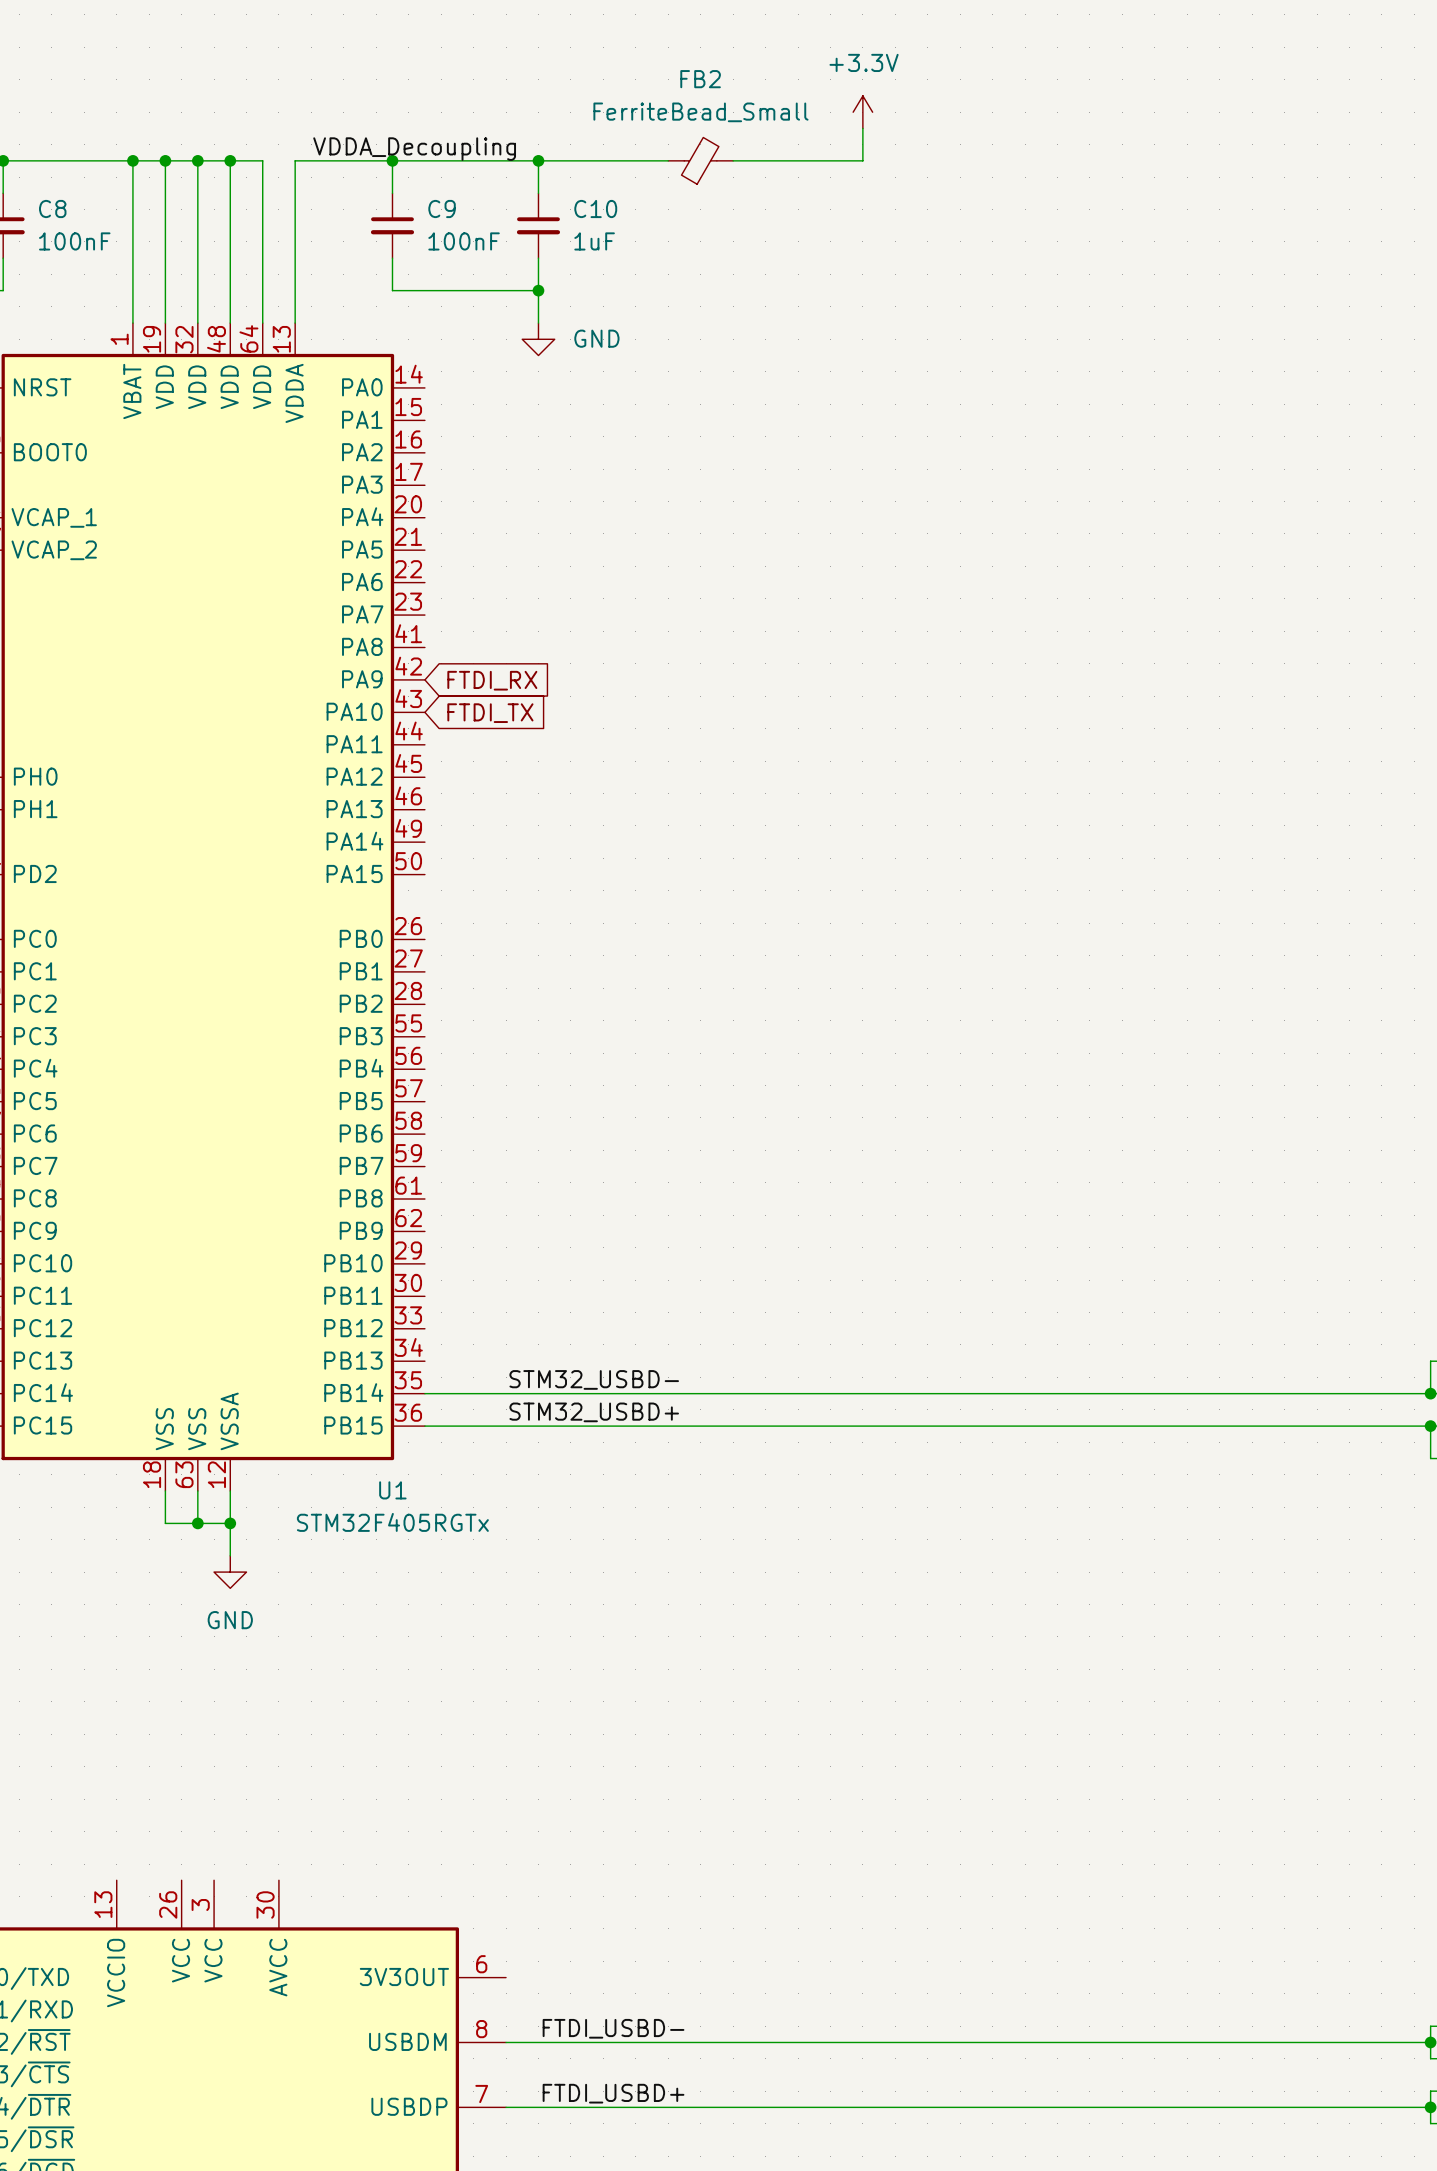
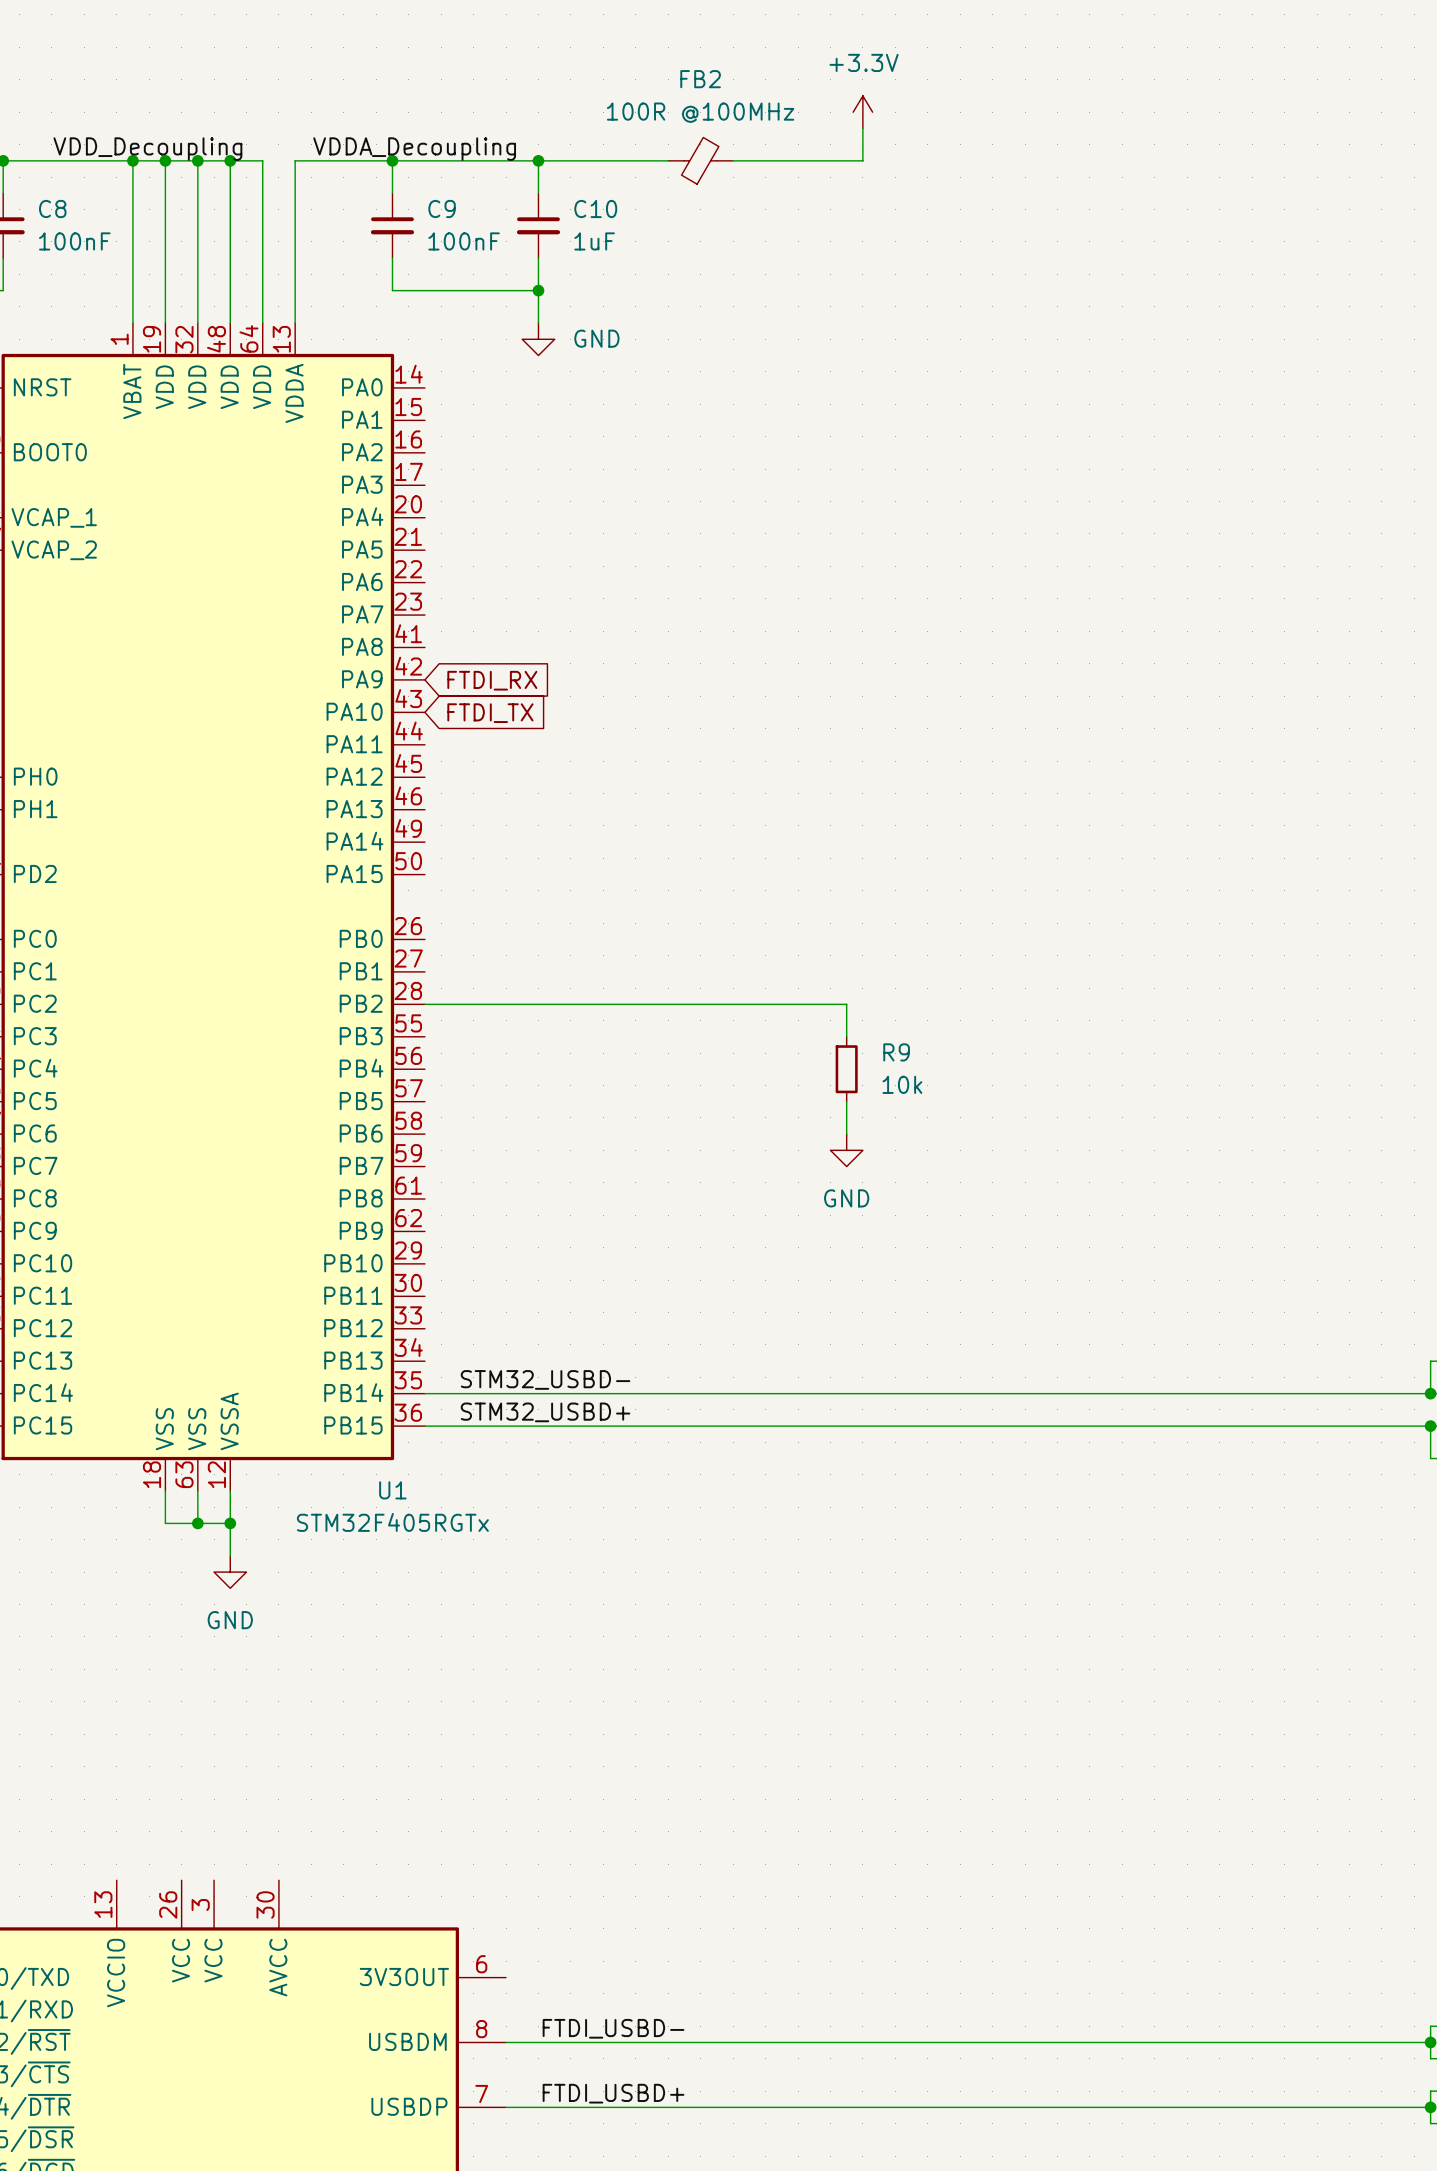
FB2 value: FerriteBead_Small (700, 112) -> 100R @100MHz (700, 112)
label: none -> VDD_Decoupling (147, 149)
wire: none -> (424, 1004) (846, 1004) (846, 1036)
R9: none -> 10k (846, 1069)
wire: none -> (846, 1101) (846, 1134)
power symbol: none -> GND (846, 1150)
label position: STM32_USBD- (594, 1379) -> STM32_USBD- (545, 1379)
label position: STM32_USBD+ (594, 1412) -> STM32_USBD+ (545, 1412)

